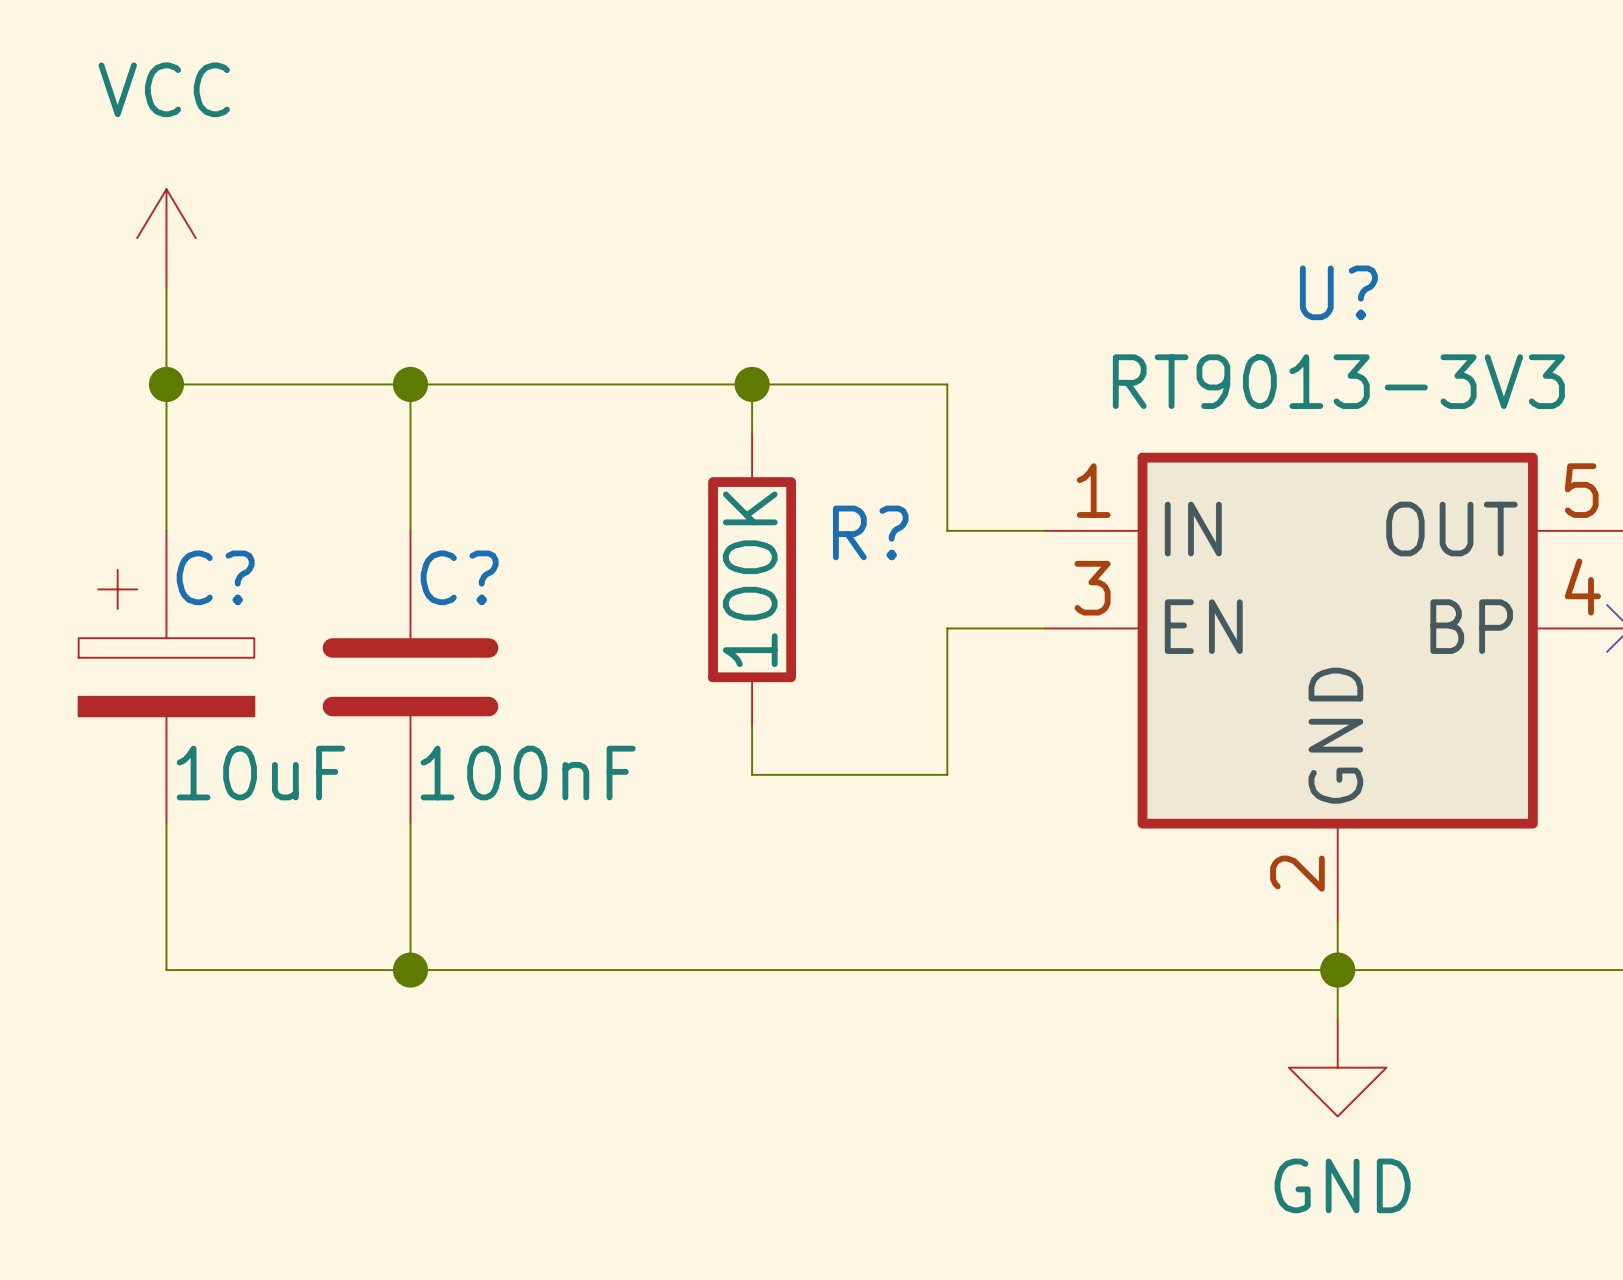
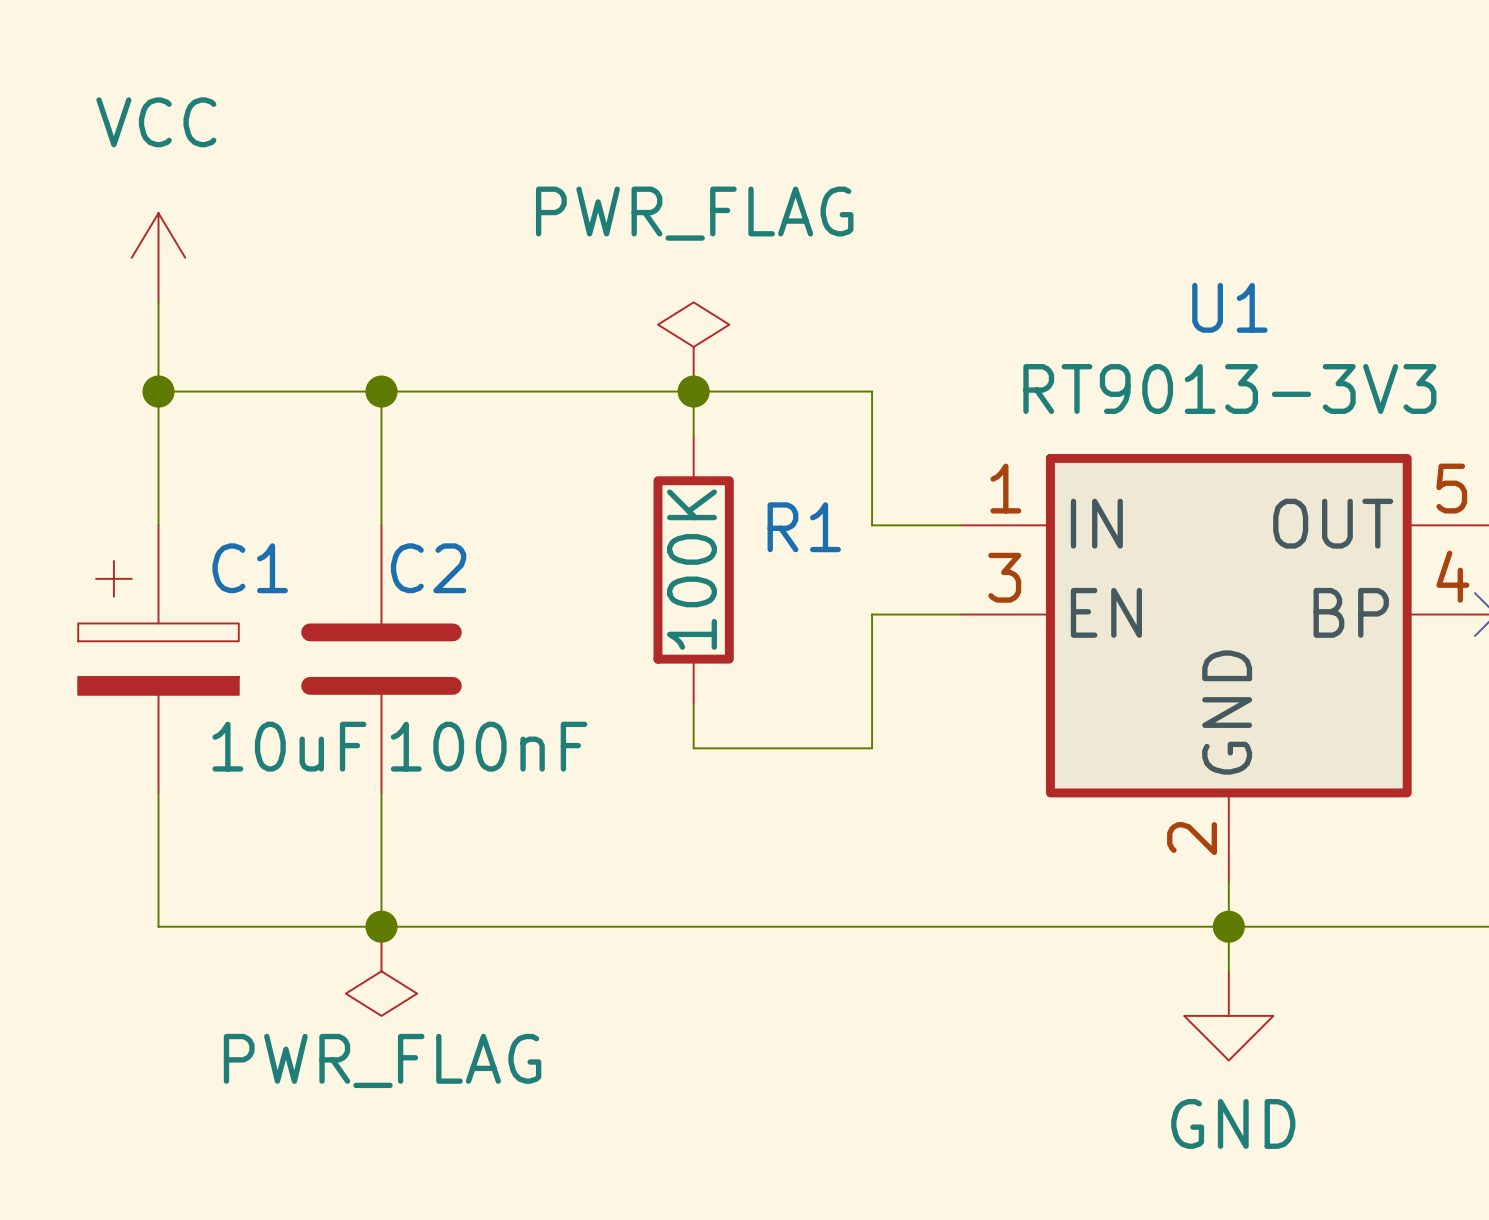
U? name: U? (1338, 292) -> U1 (1229, 307)
power symbol: none -> PWR_FLAG (693, 346)
R? name: R? (870, 532) -> R1 (804, 527)
C? name: C? (215, 577) -> C1 (250, 568)
C? name: C? (459, 577) -> C2 (428, 568)
C? value position: 10uF (260, 773) -> 10uF (289, 746)
power symbol: none -> PWR_FLAG (381, 971)

